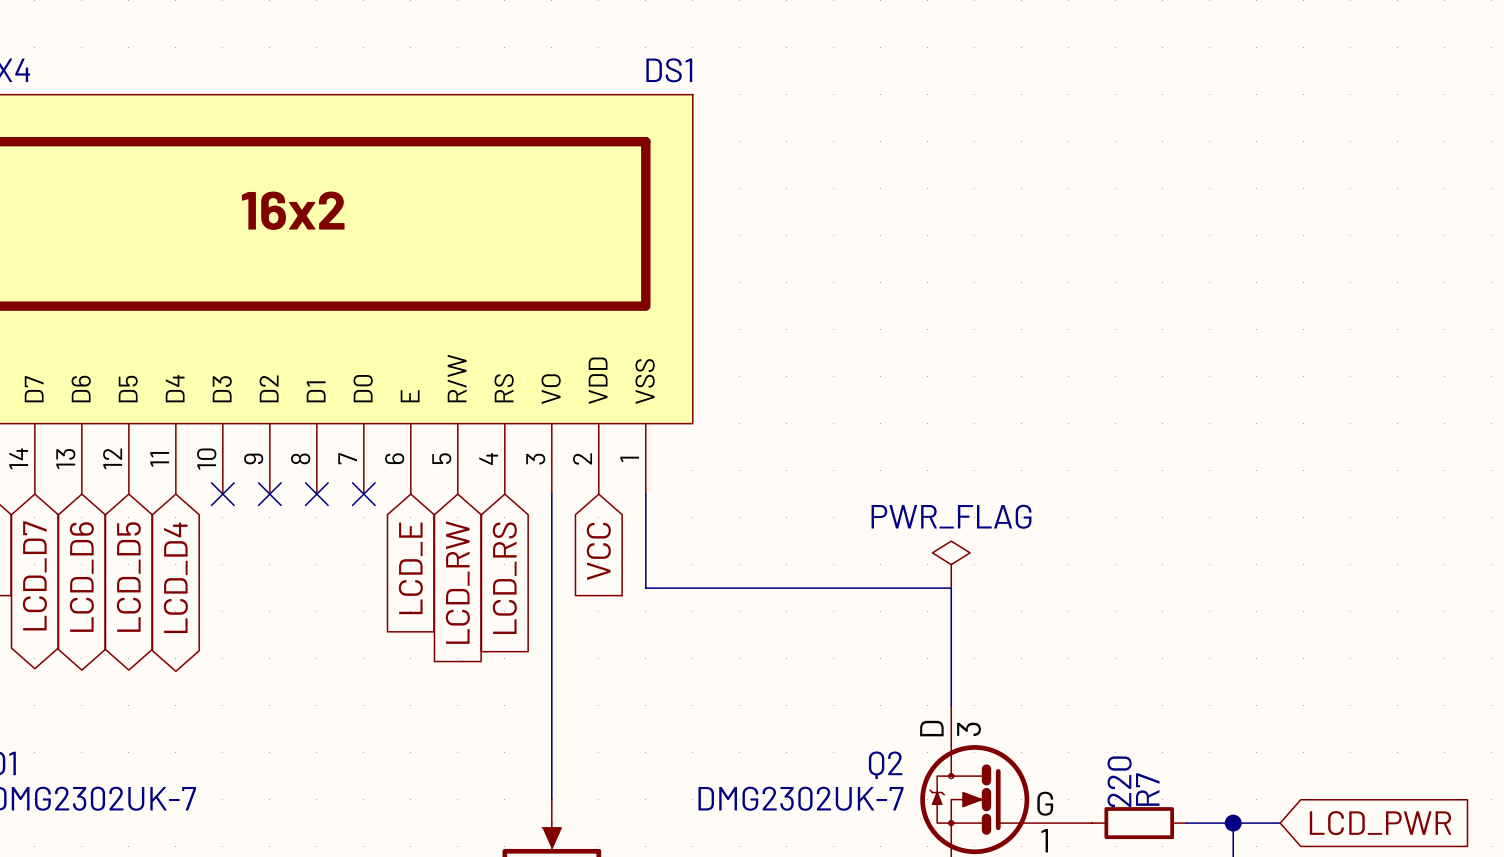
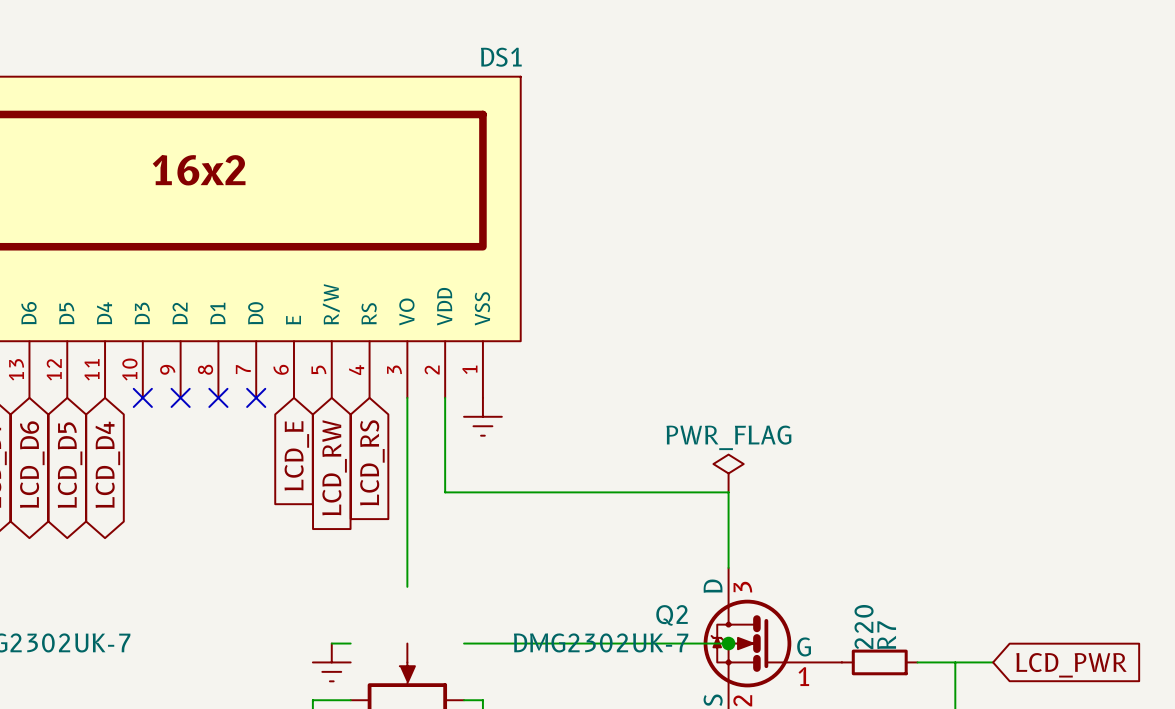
wire: (645, 494) (645, 588) (951, 588) (951, 611) -> (445, 397) (445, 492) (728, 492)
power symbol: none -> (482, 416)
global label: VCC (598, 551) -> none
power symbol position: PWR_FLAG (951, 564) -> PWR_FLAG (728, 473)
wire: (551, 729) (551, 799) -> none
wire: none -> (331, 643) (350, 643)
wire: none -> (464, 643) (728, 643)
junction: none -> (728, 643)
power symbol: none -> (331, 662)
junction: (1233, 823) -> none

